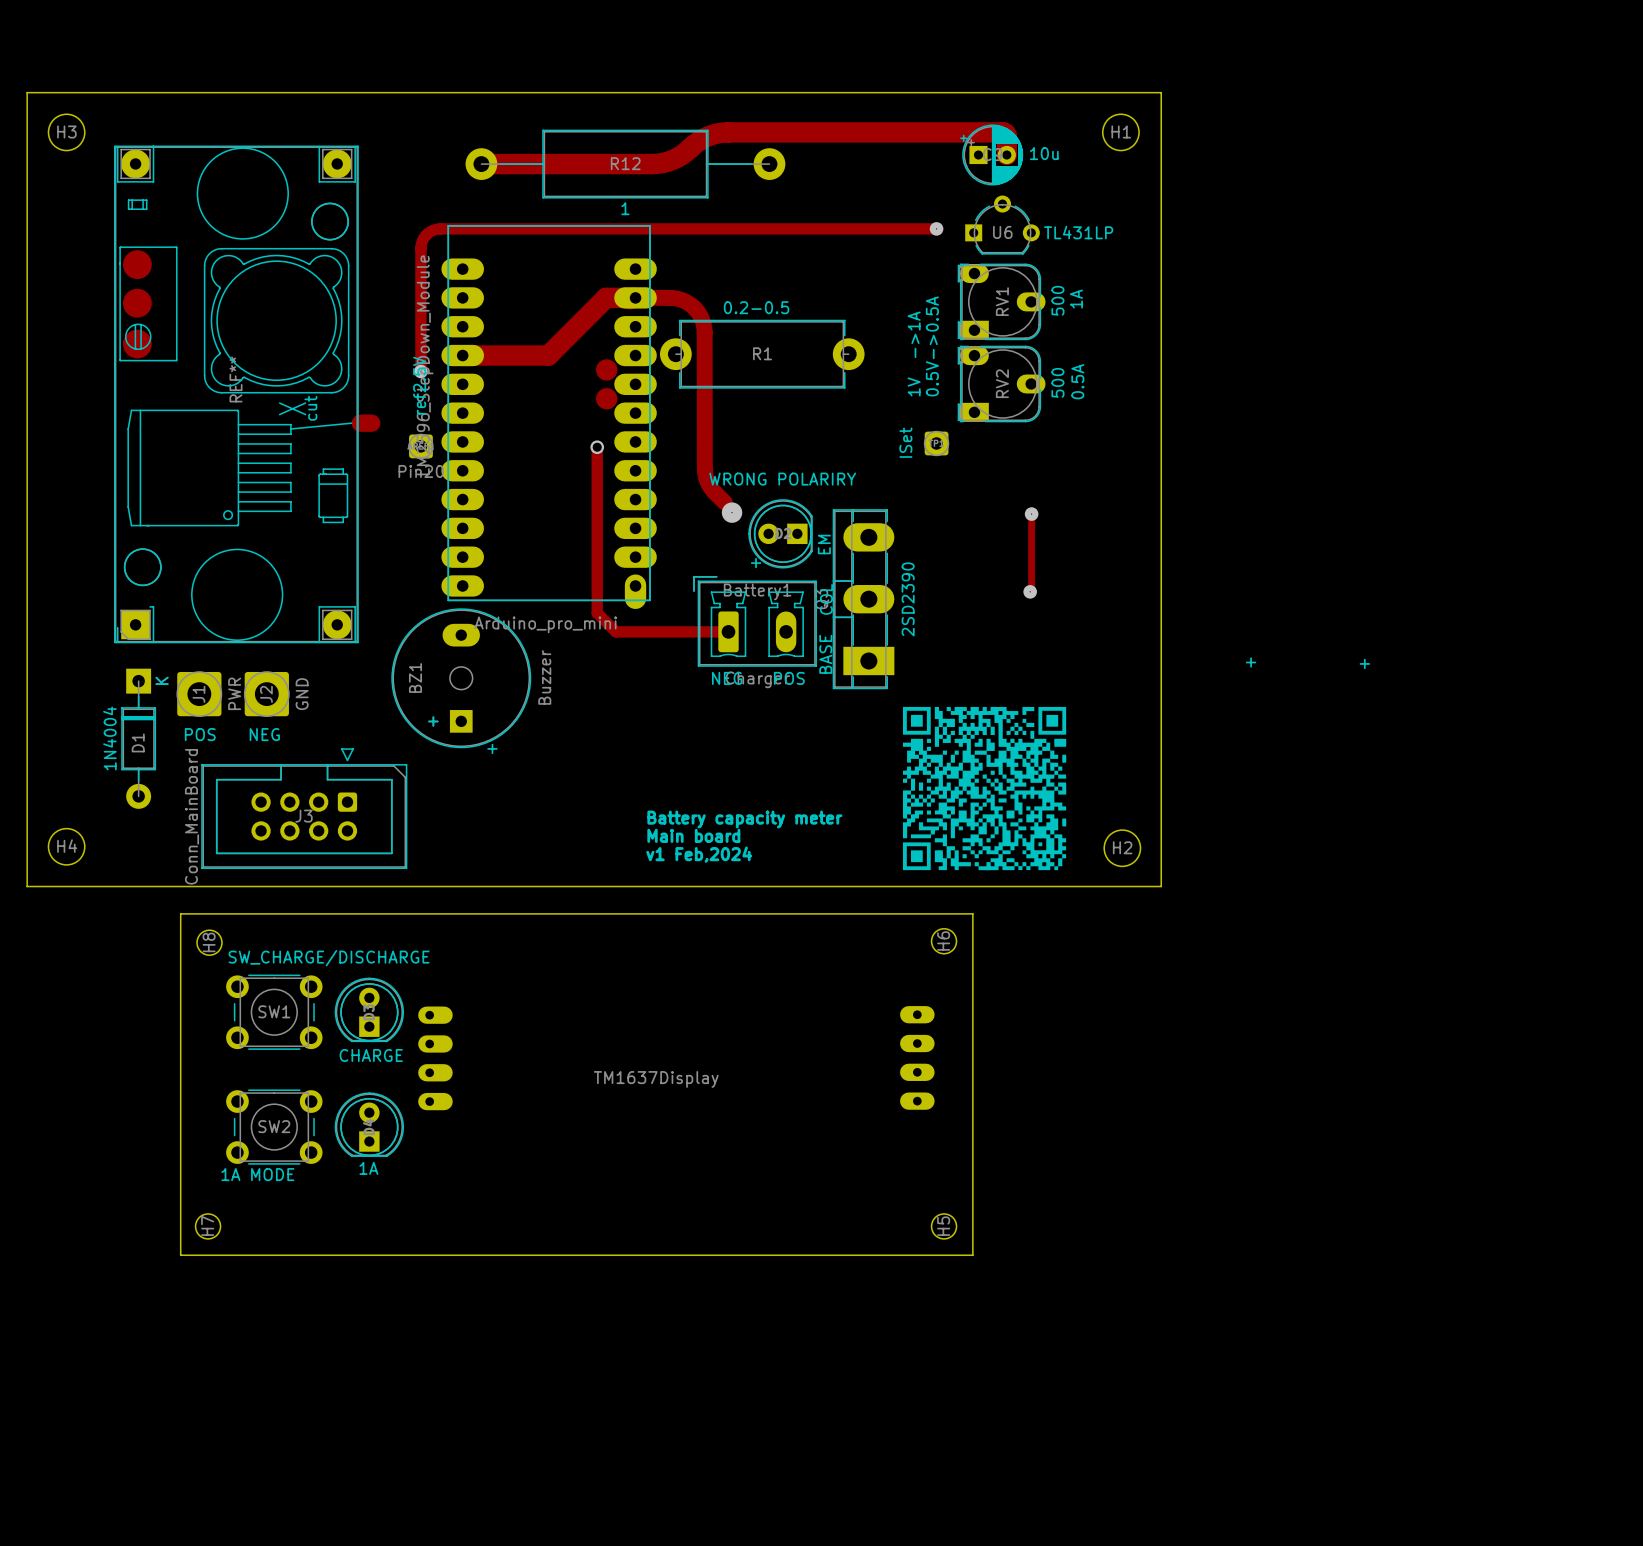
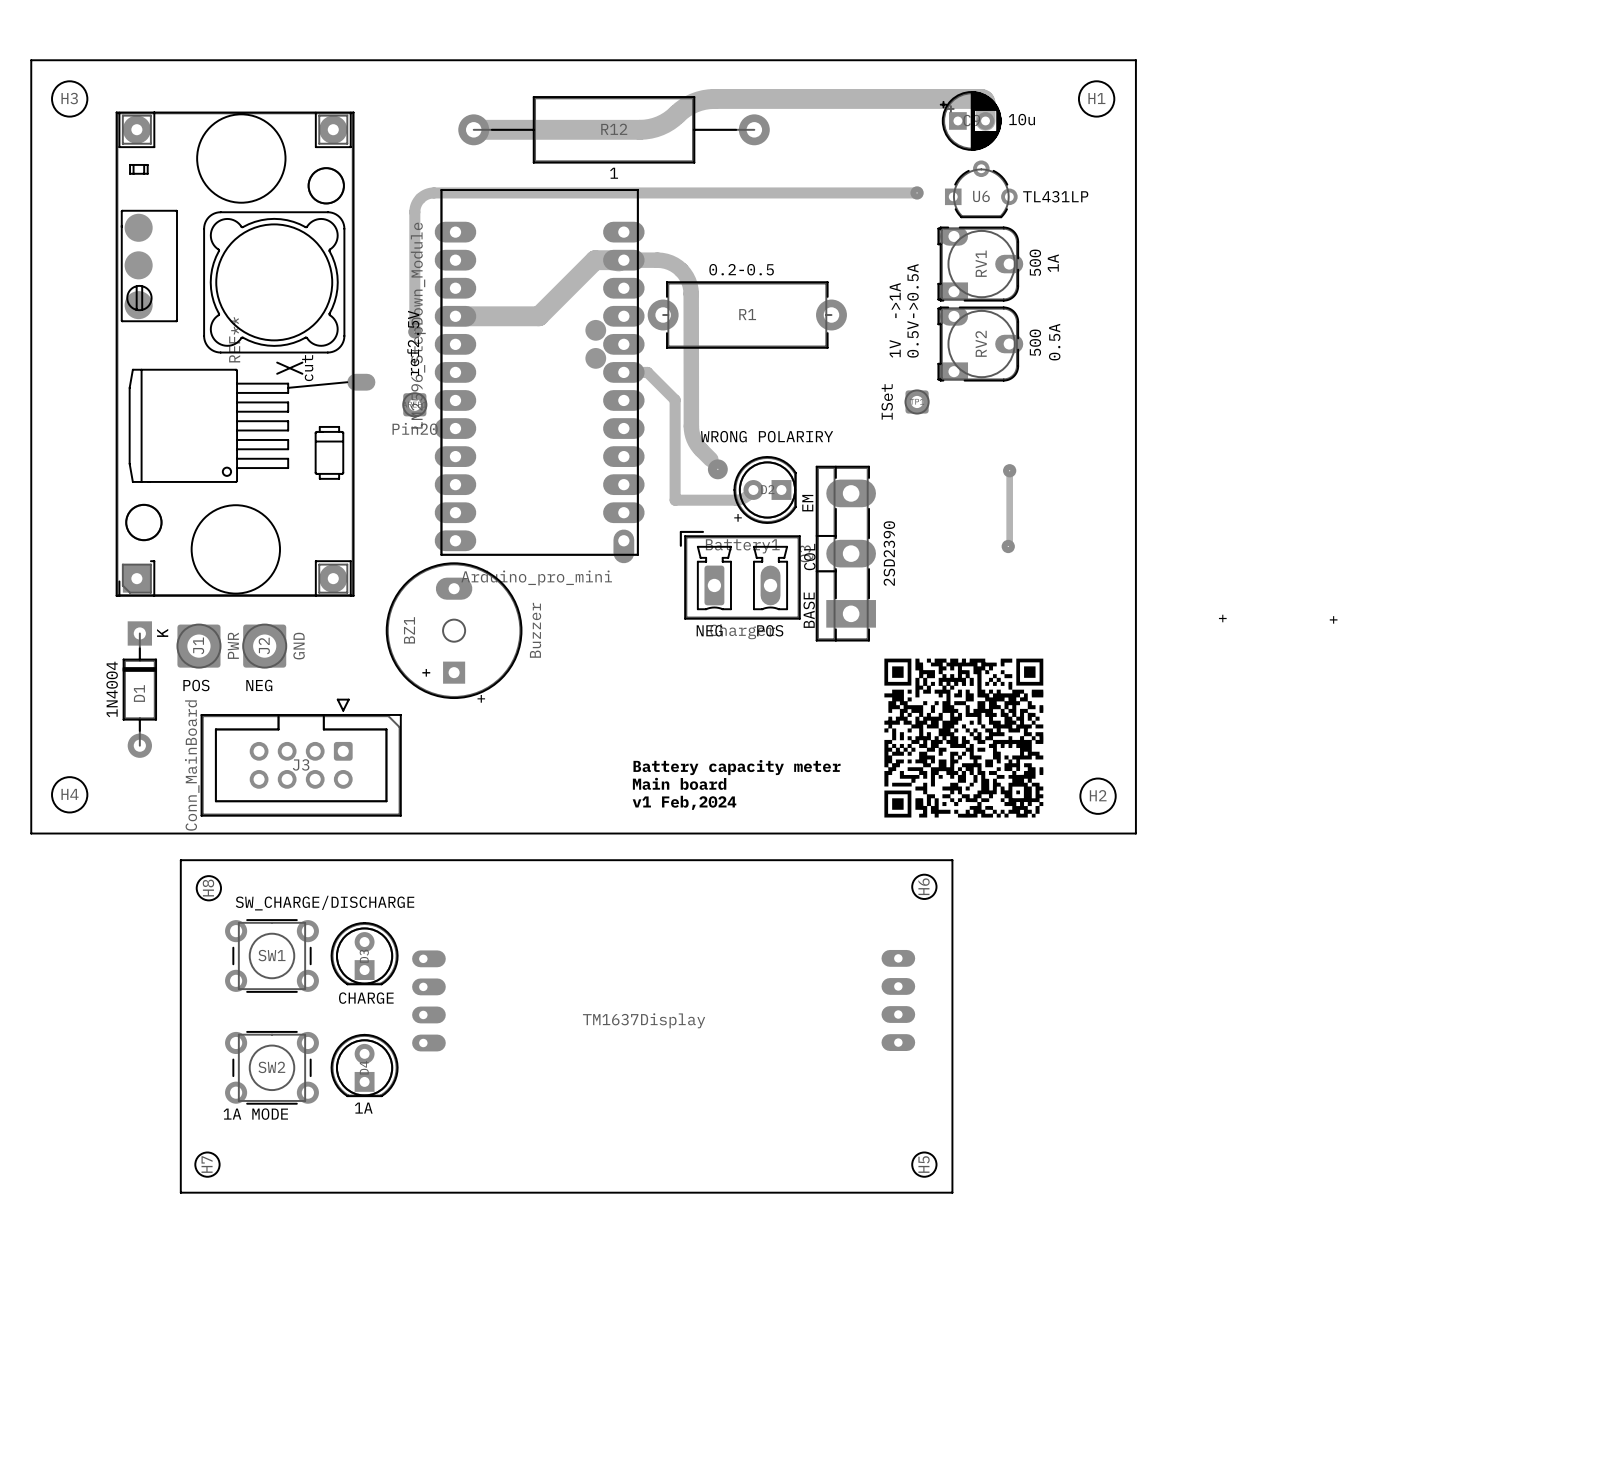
track: none -> (623, 372) (647, 372) (675, 399) (675, 500) (738, 500) (744, 497) (753, 489)
track: (597, 447) (597, 613) (615, 631) (728, 631) -> none
via: (597, 447) -> none

